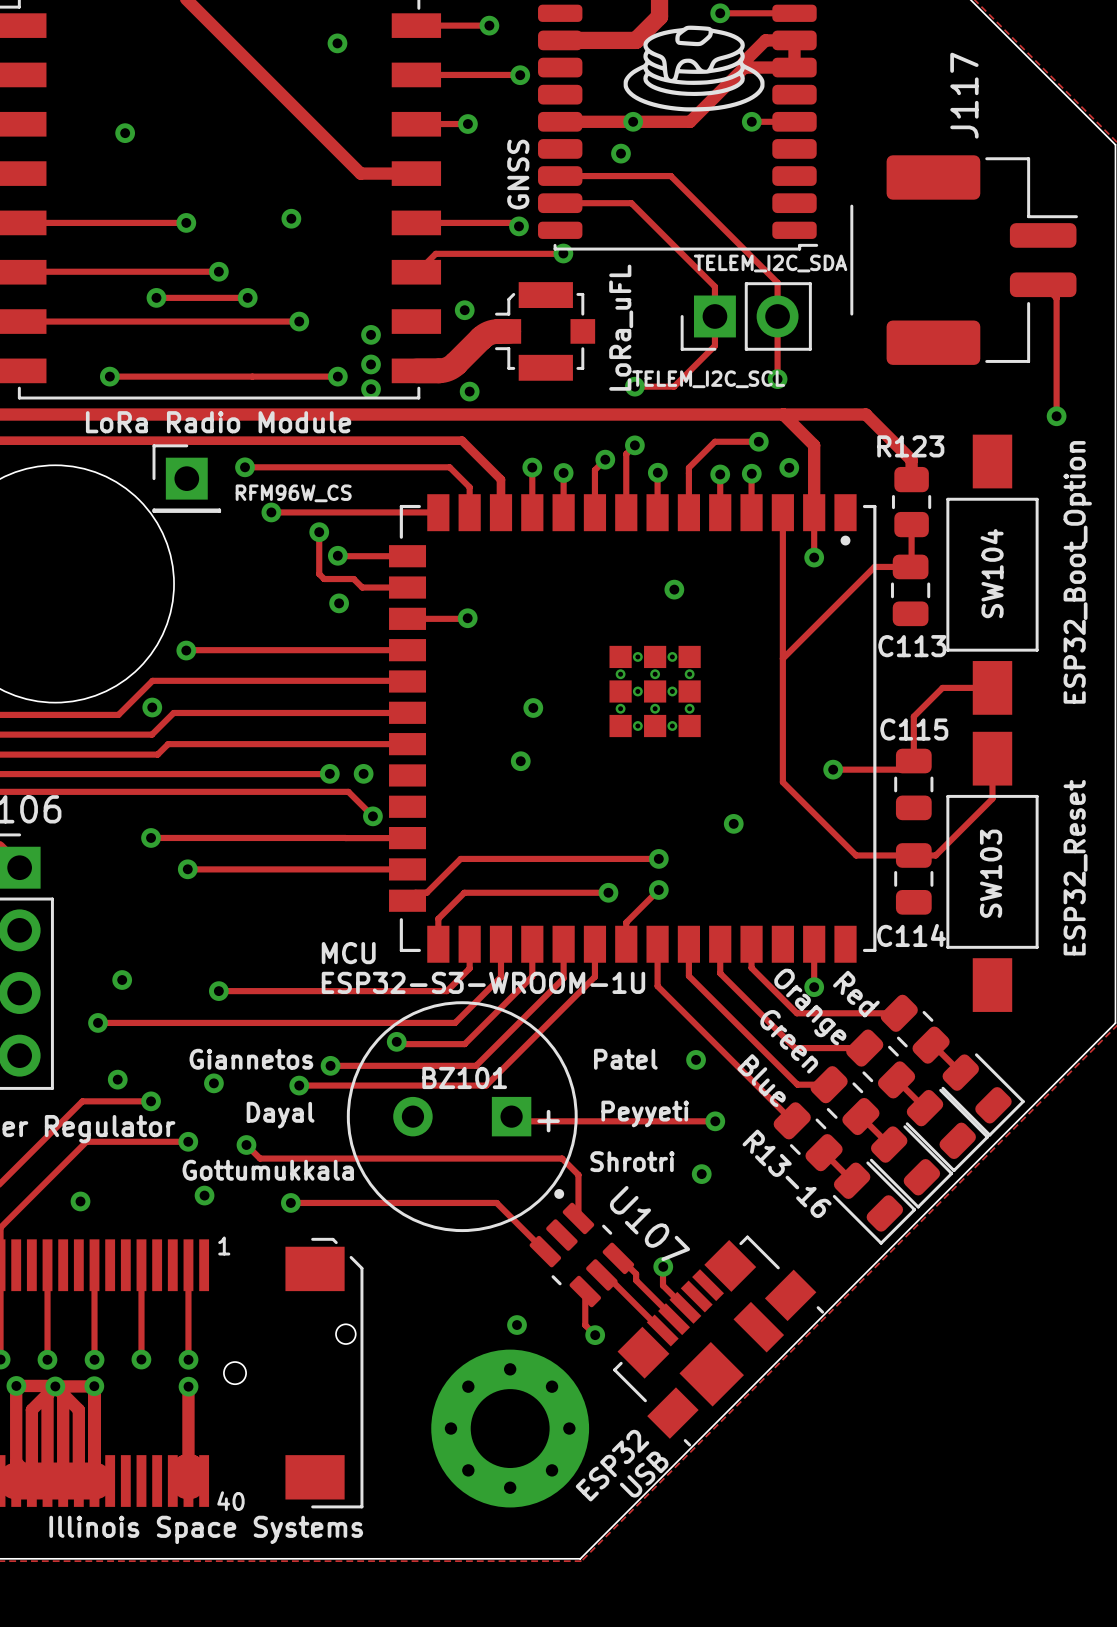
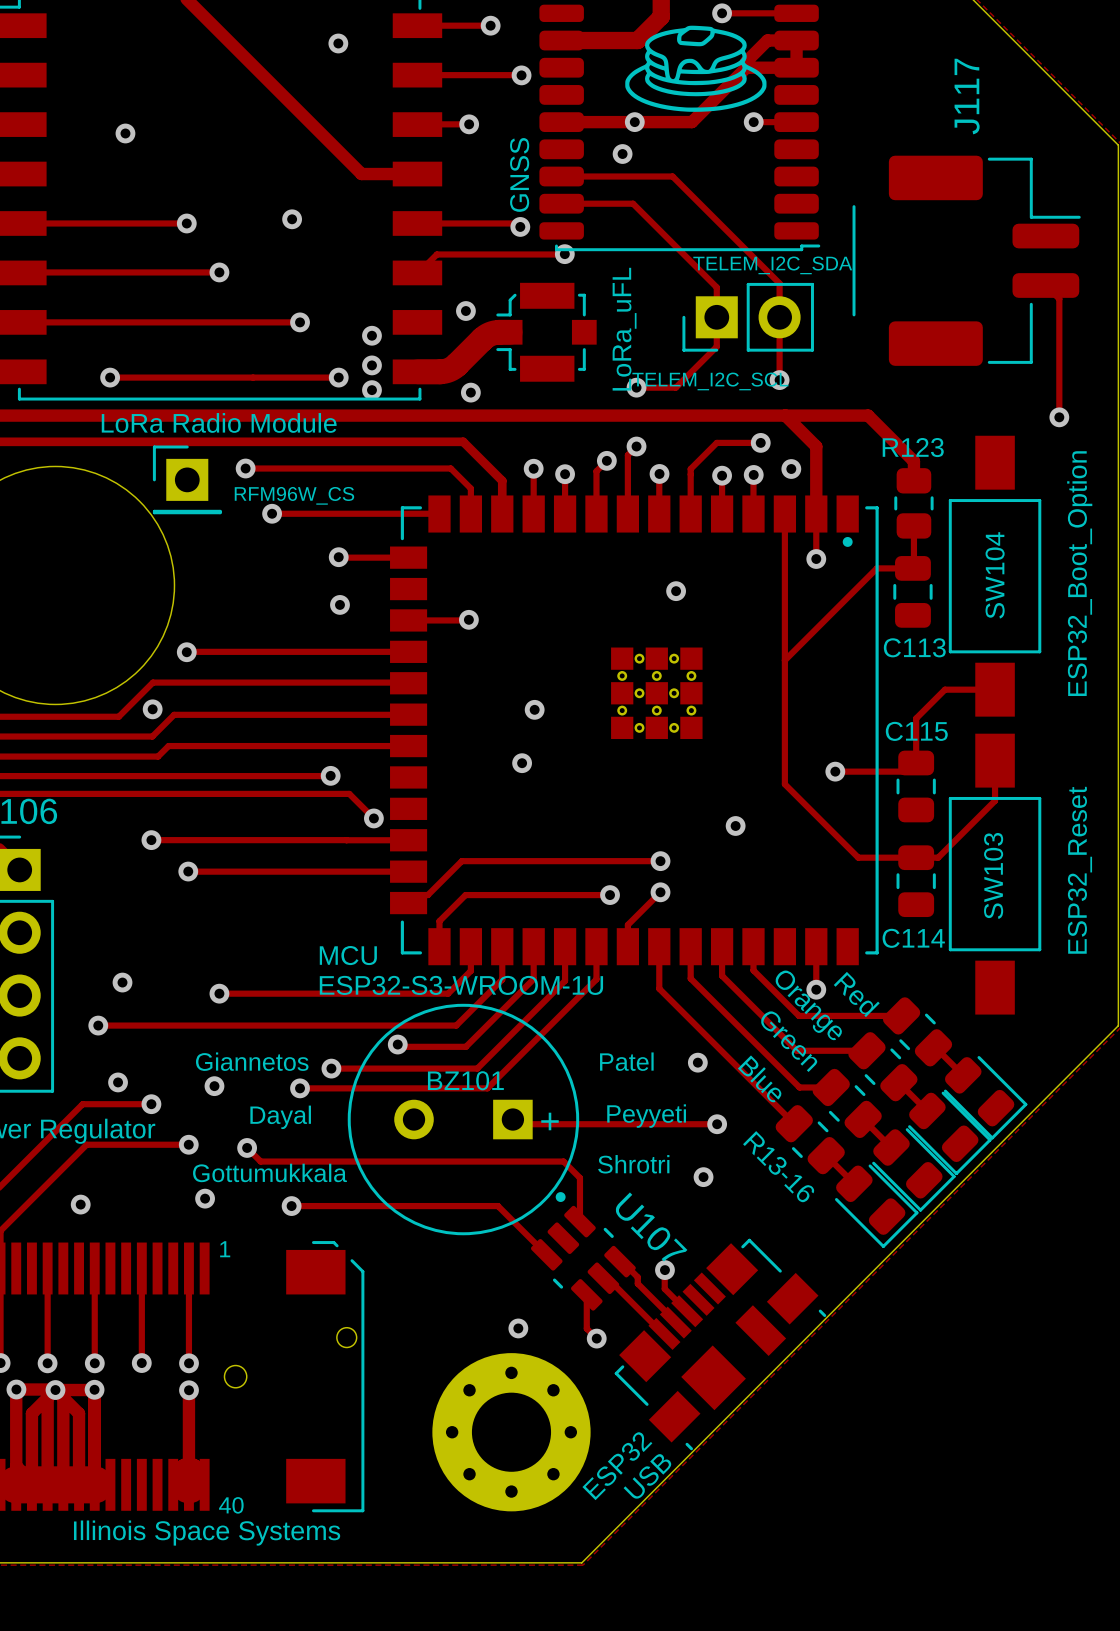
track: (156, 297) (247, 297) -> none
via: (156, 297) -> none
via: (247, 297) -> none
track: (319, 532) (319, 574) (324, 579) (353, 579) (362, 587) (407, 587) -> none
via: (319, 532) -> none
via: (363, 773) -> none

